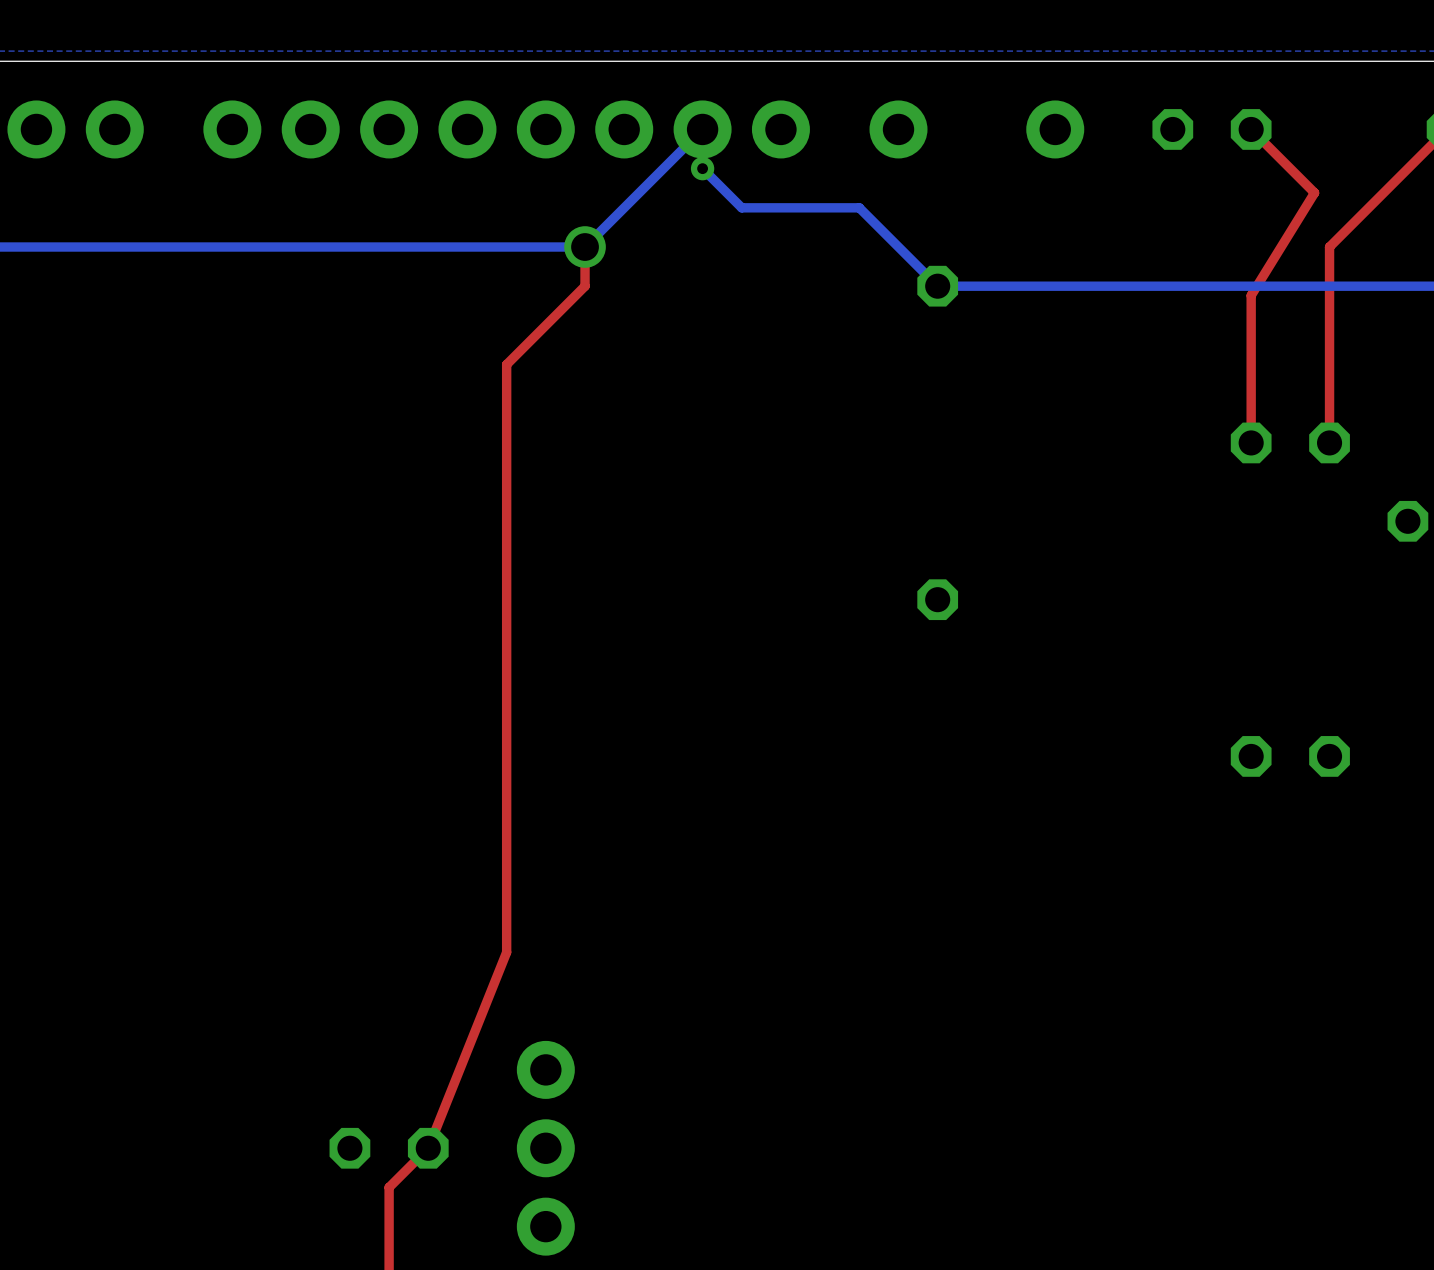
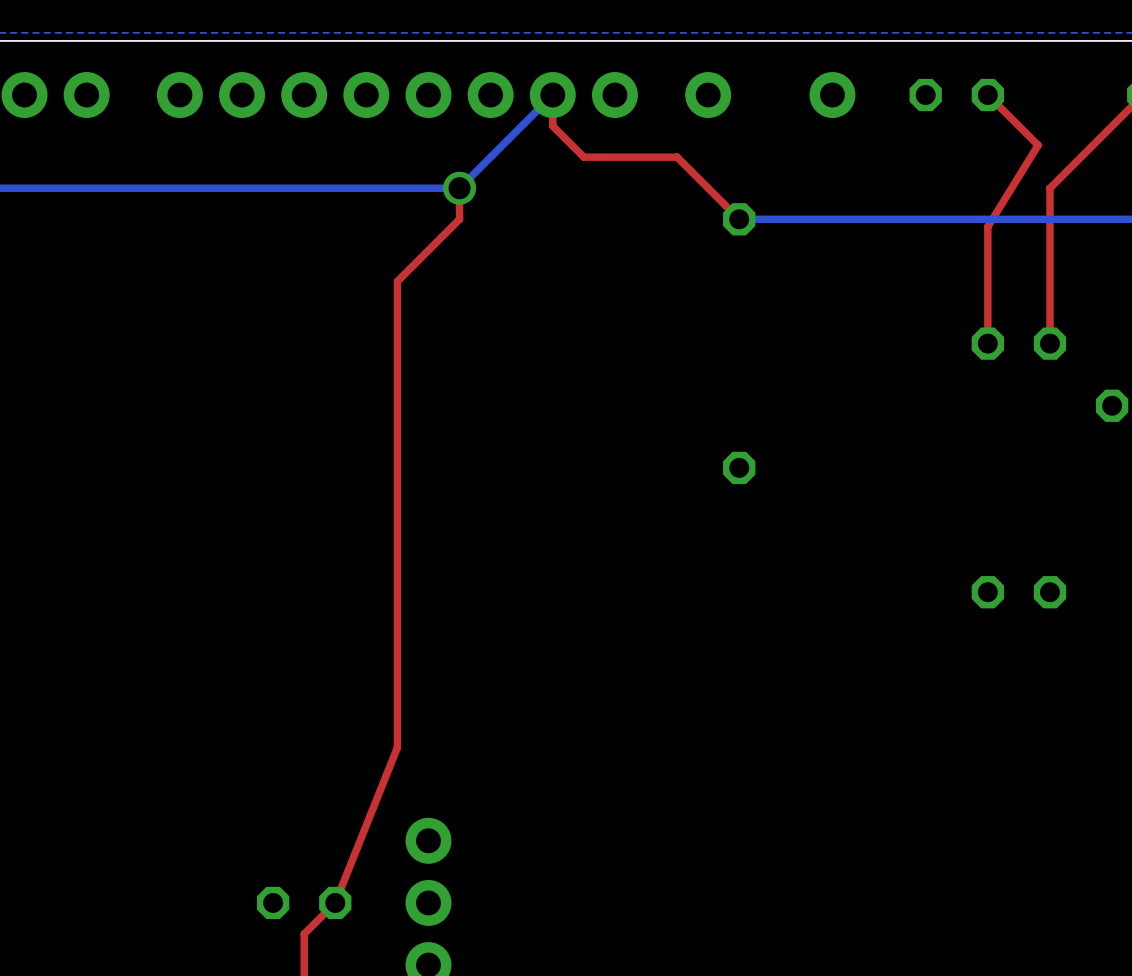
top track: none -> (552, 126) (583, 157) (677, 157) (739, 219)
bottom track: (702, 168) (741, 207) (859, 207) (937, 286) -> none
via: (702, 168) -> none

